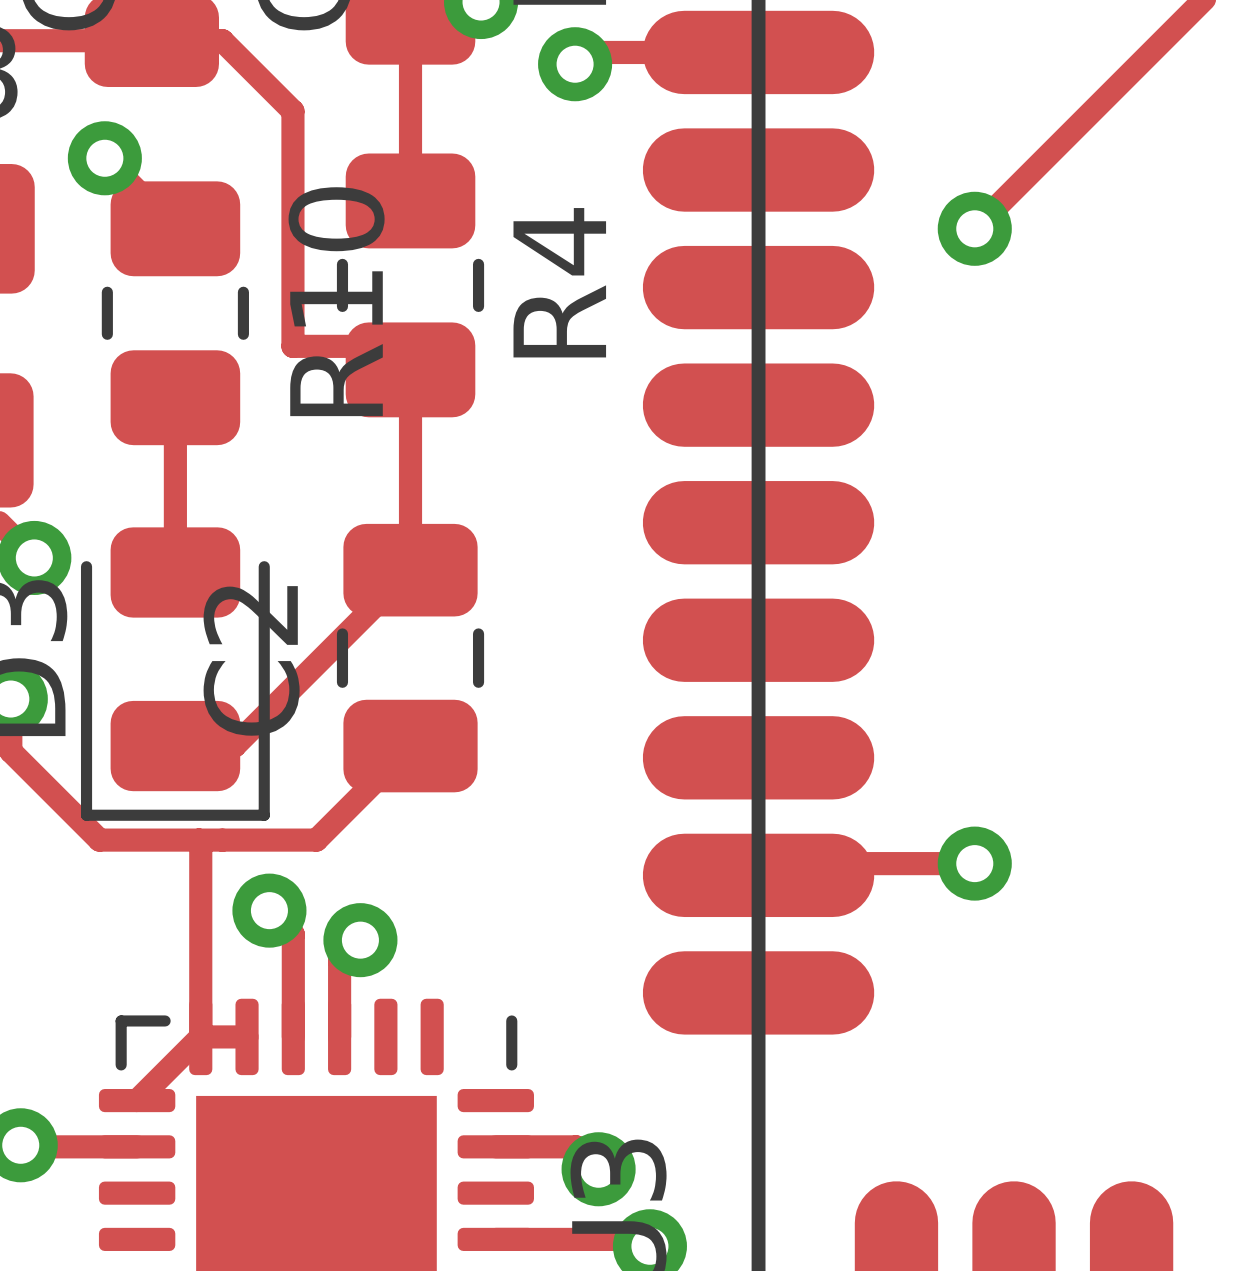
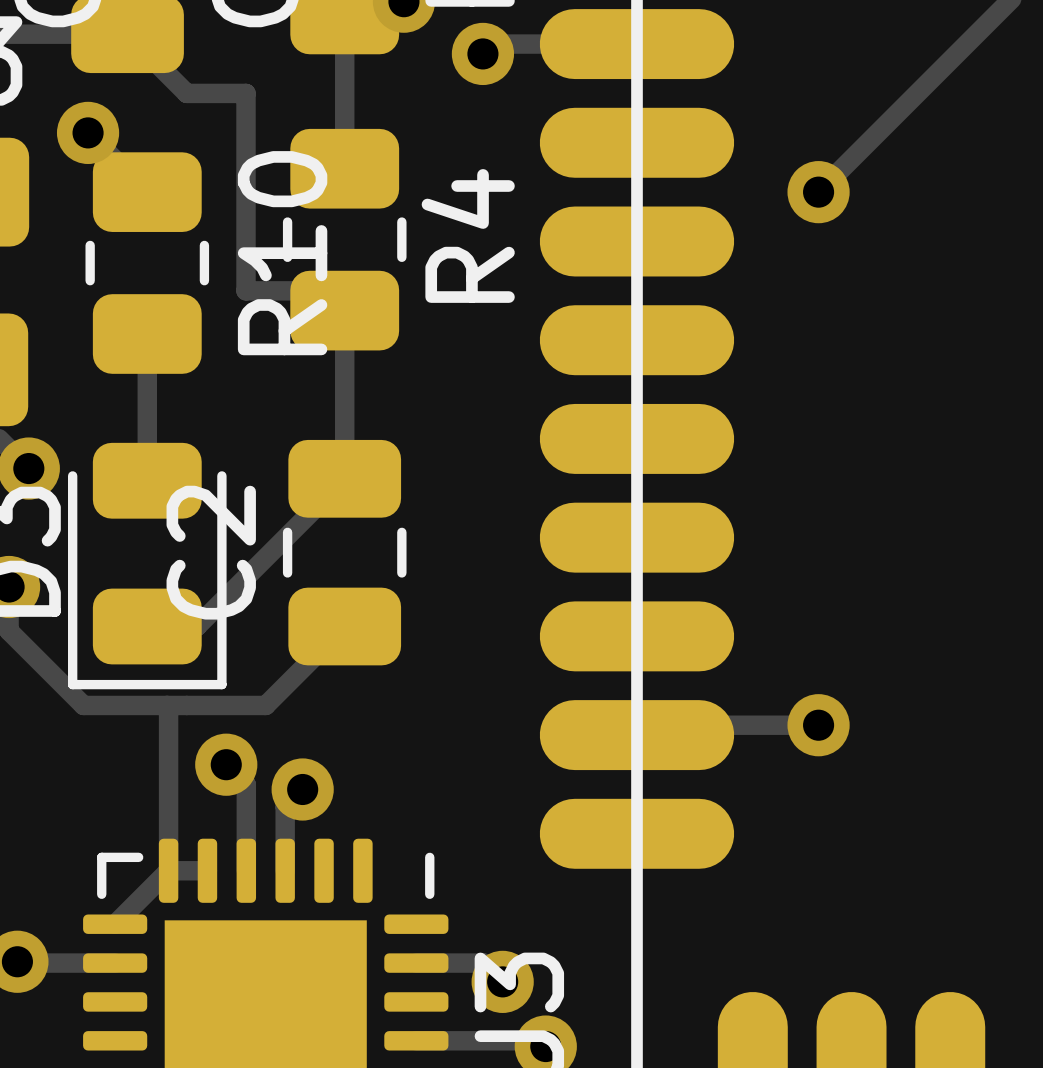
track: (151, 40) (222, 40) (292, 111) -> (127, 34) (186, 93) (246, 93)

